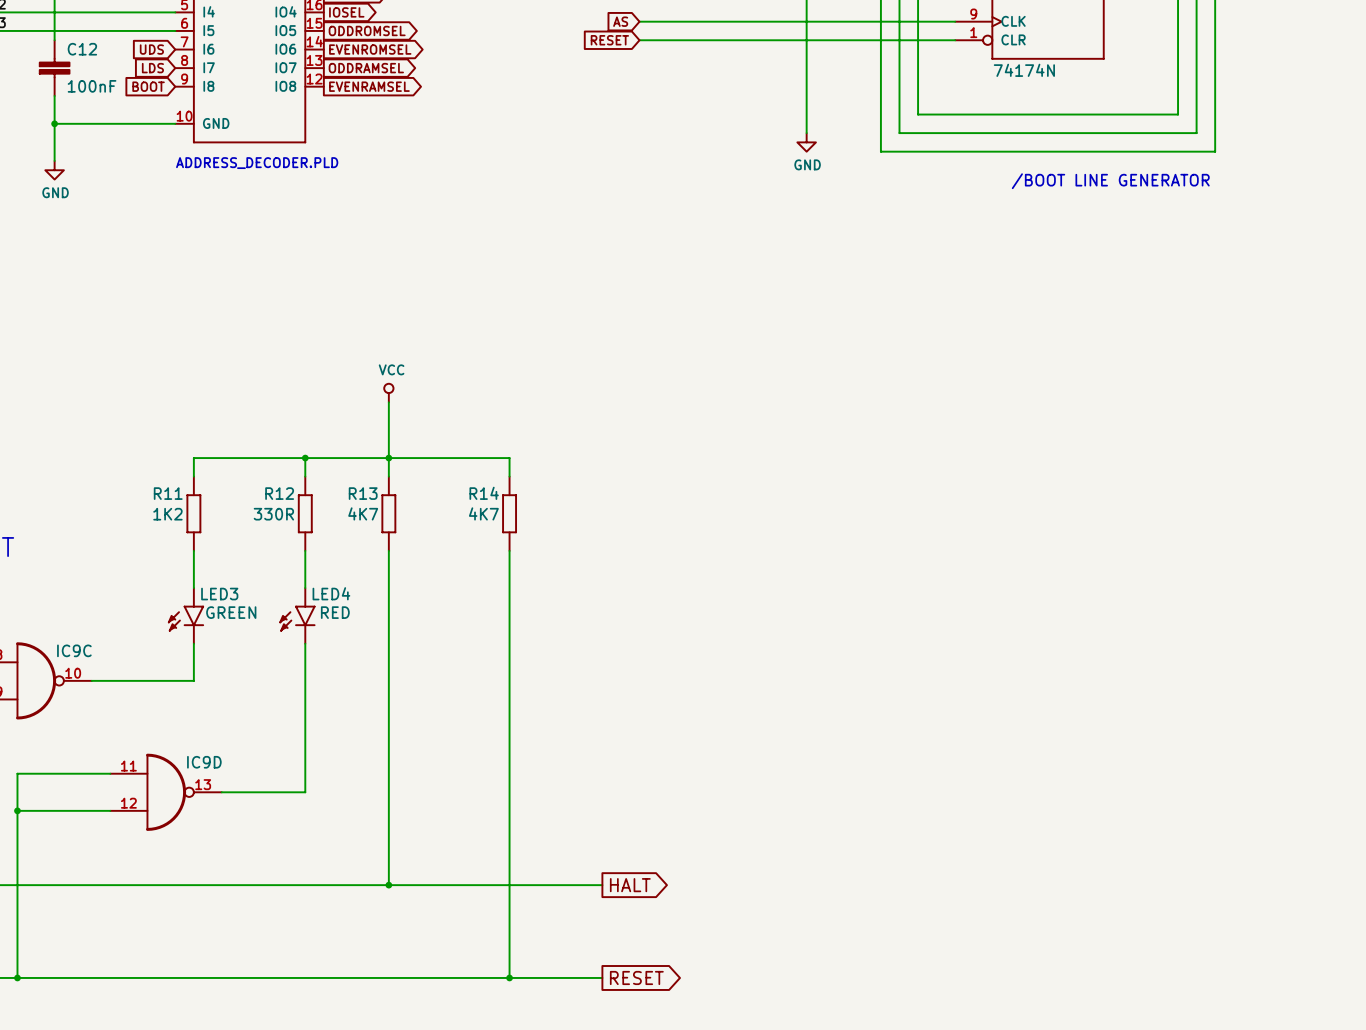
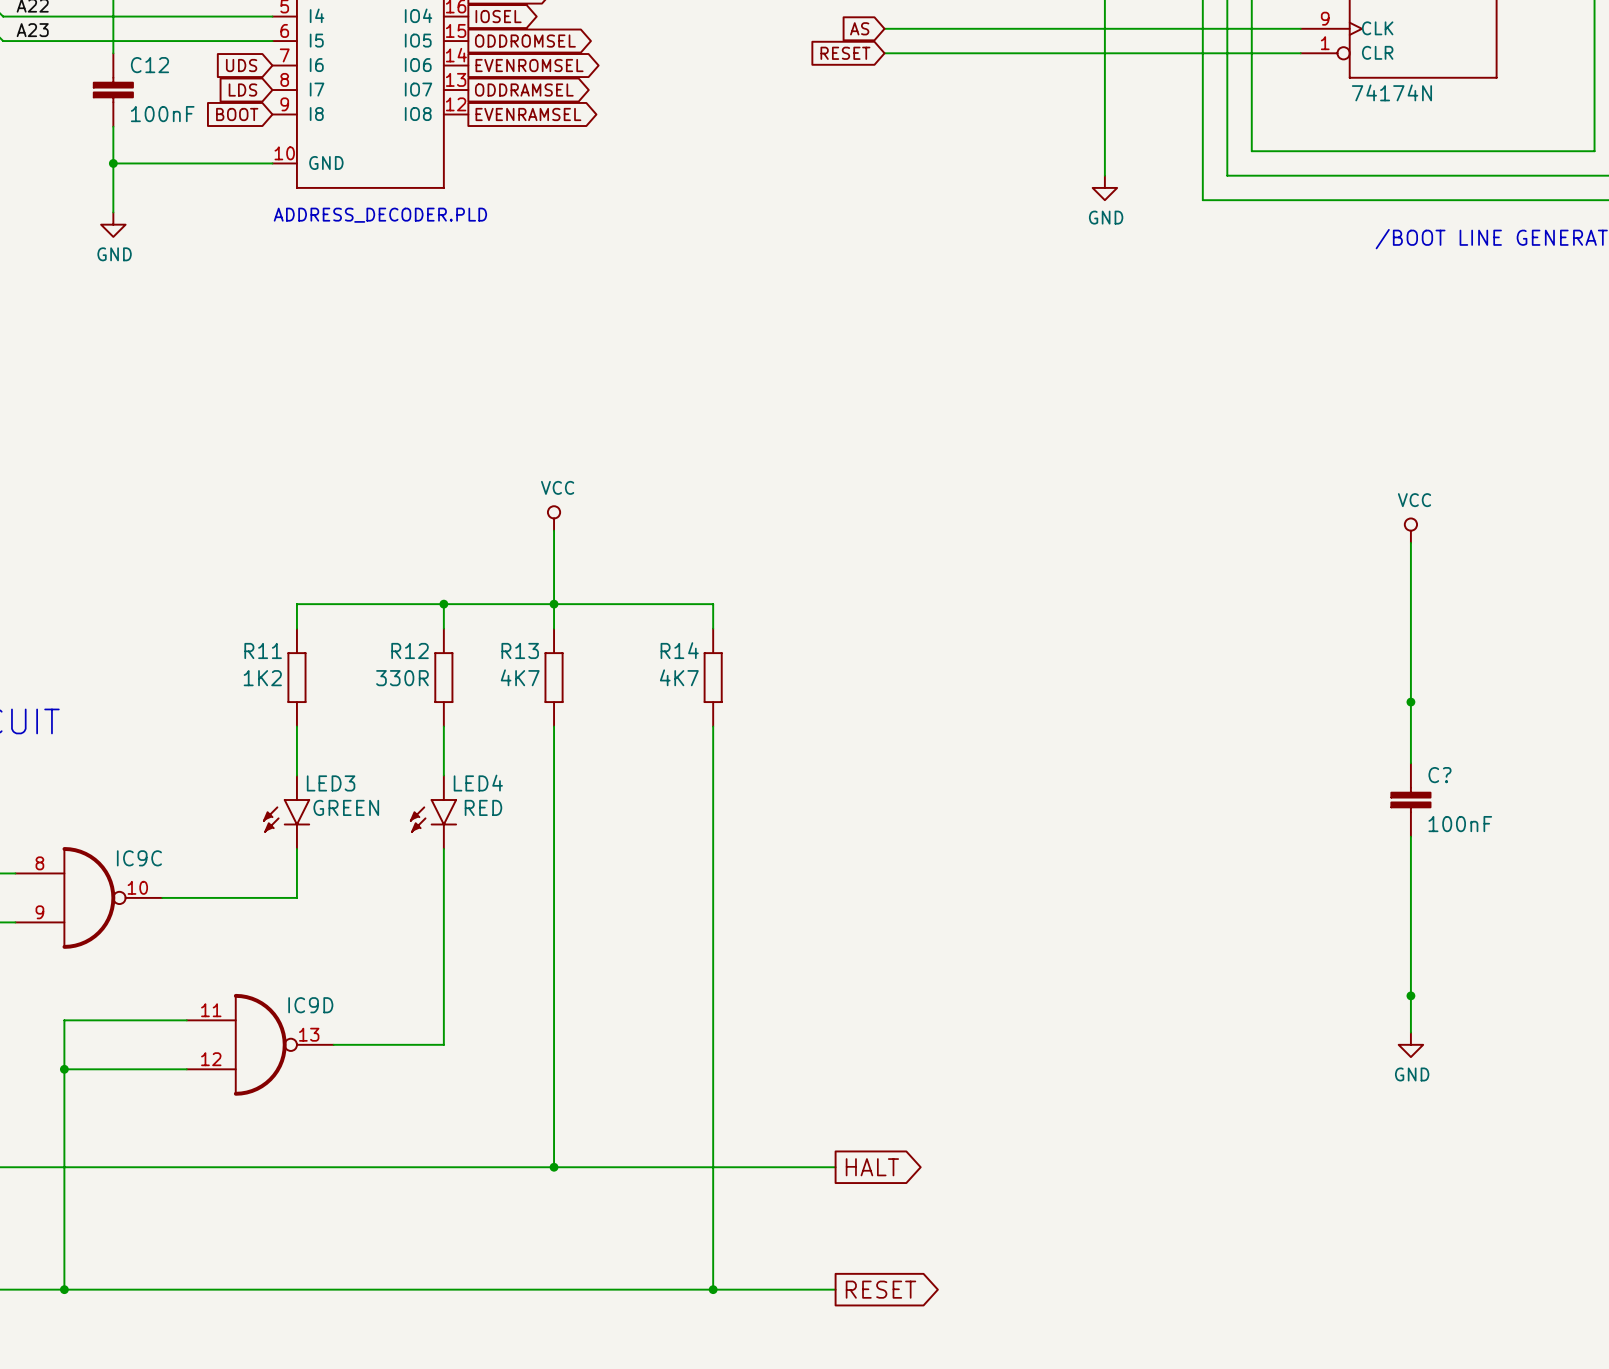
power symbol: none -> VCC (1410, 530)
wire: none -> (1410, 542) (1410, 763)
junction: none -> (1410, 702)
C?: none -> 100nF (1410, 800)
wire: none -> (1410, 836) (1410, 1032)
junction: none -> (1410, 995)
power symbol: none -> GND (1410, 1044)

